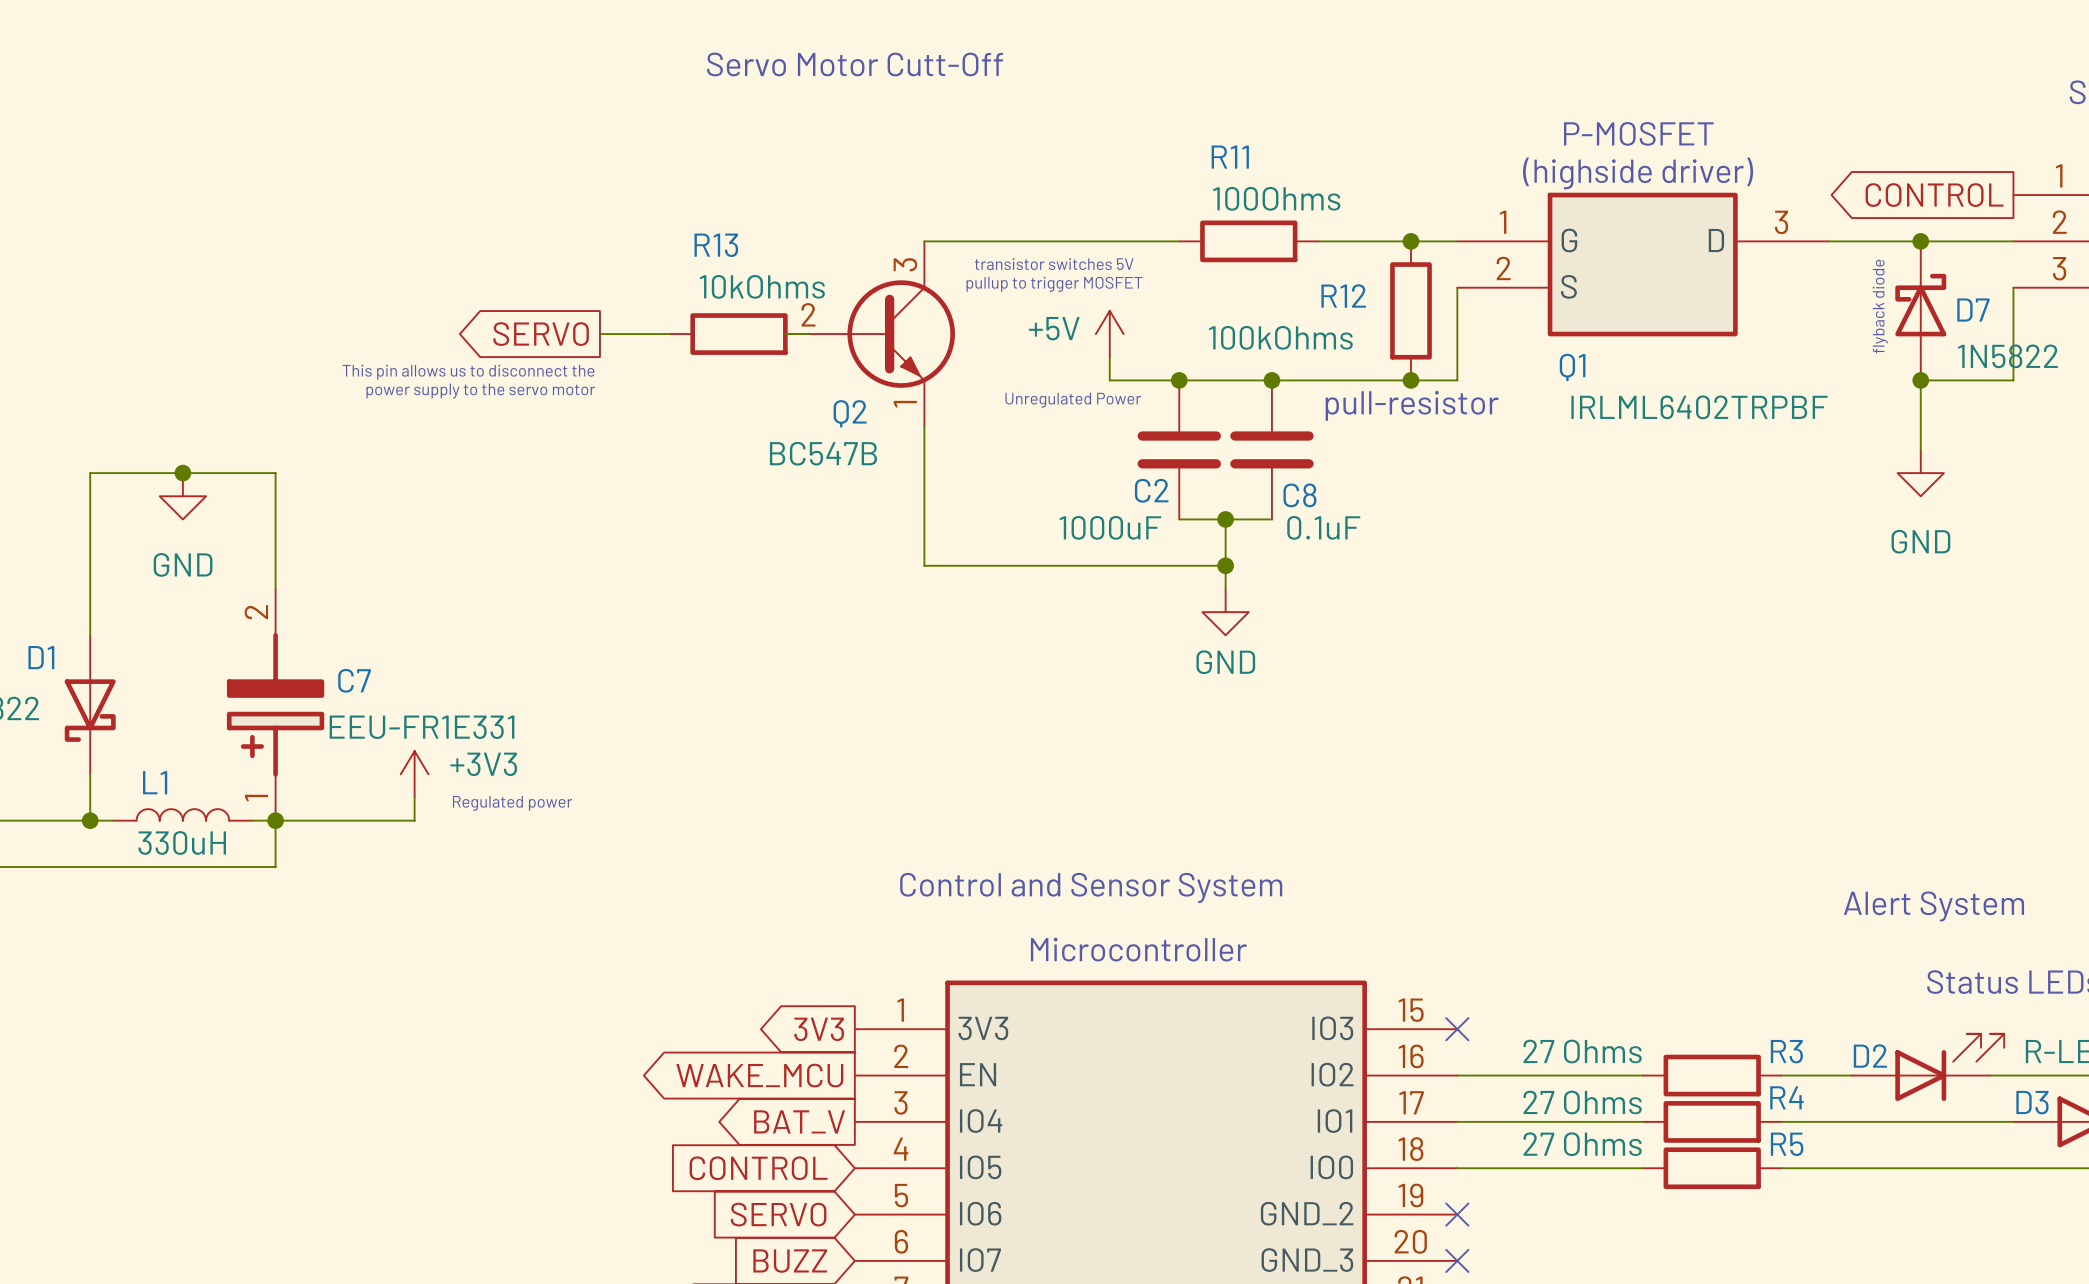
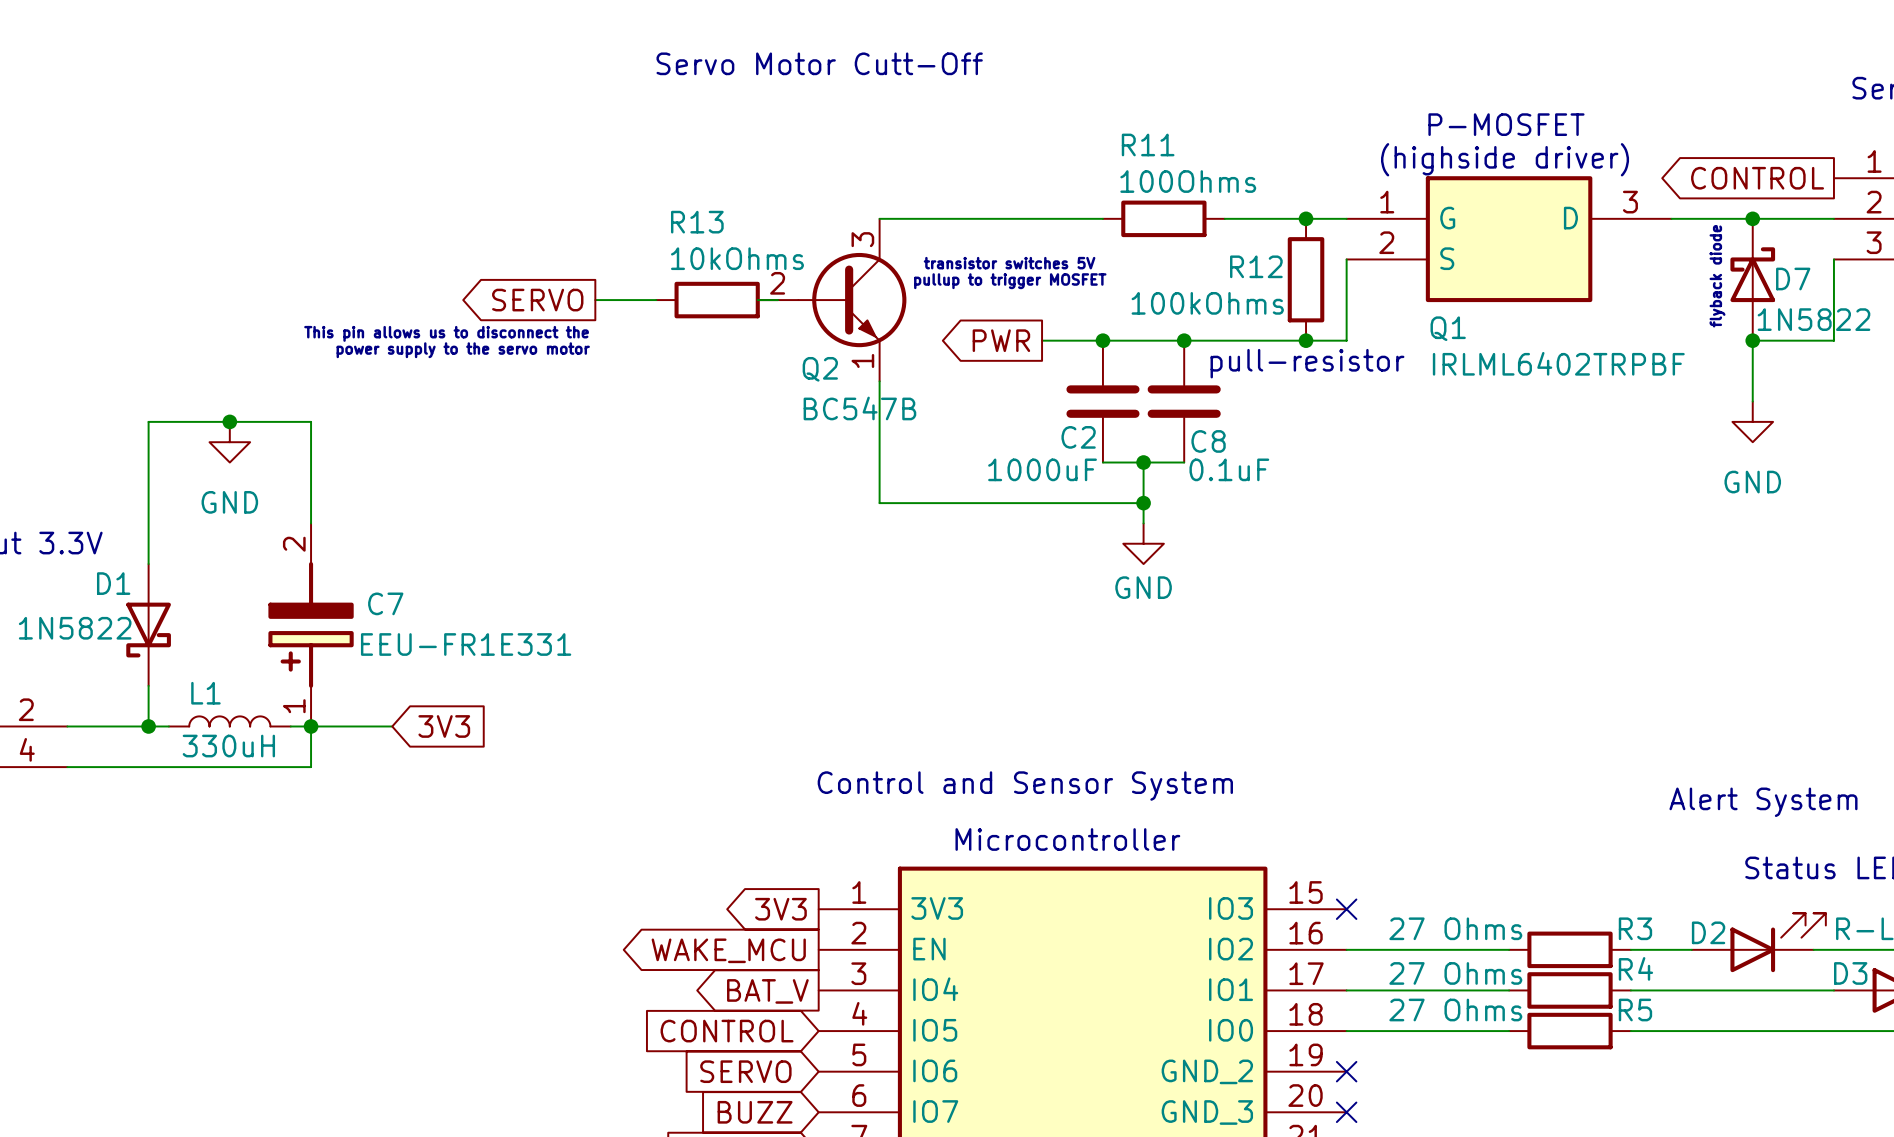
text position: transistor switches 5V (1054, 264) -> transistor switches 5V (1009, 263)
text position: pullup to trigger MOSFET (1054, 284) -> pullup to trigger MOSFET (1010, 281)
power symbol: +5V (1109, 334) -> none
global label: none -> PWR (1001, 340)
text: Unregulated Power (1073, 400) -> none
Q2 value position: BC547B (823, 453) -> BC547B (859, 408)
power symbol: +3V3 (414, 774) -> none
wire: (414, 797) (414, 820) (368, 820) -> none
text: Regulated power (512, 803) -> none
global label: none -> 3V3 (444, 726)

